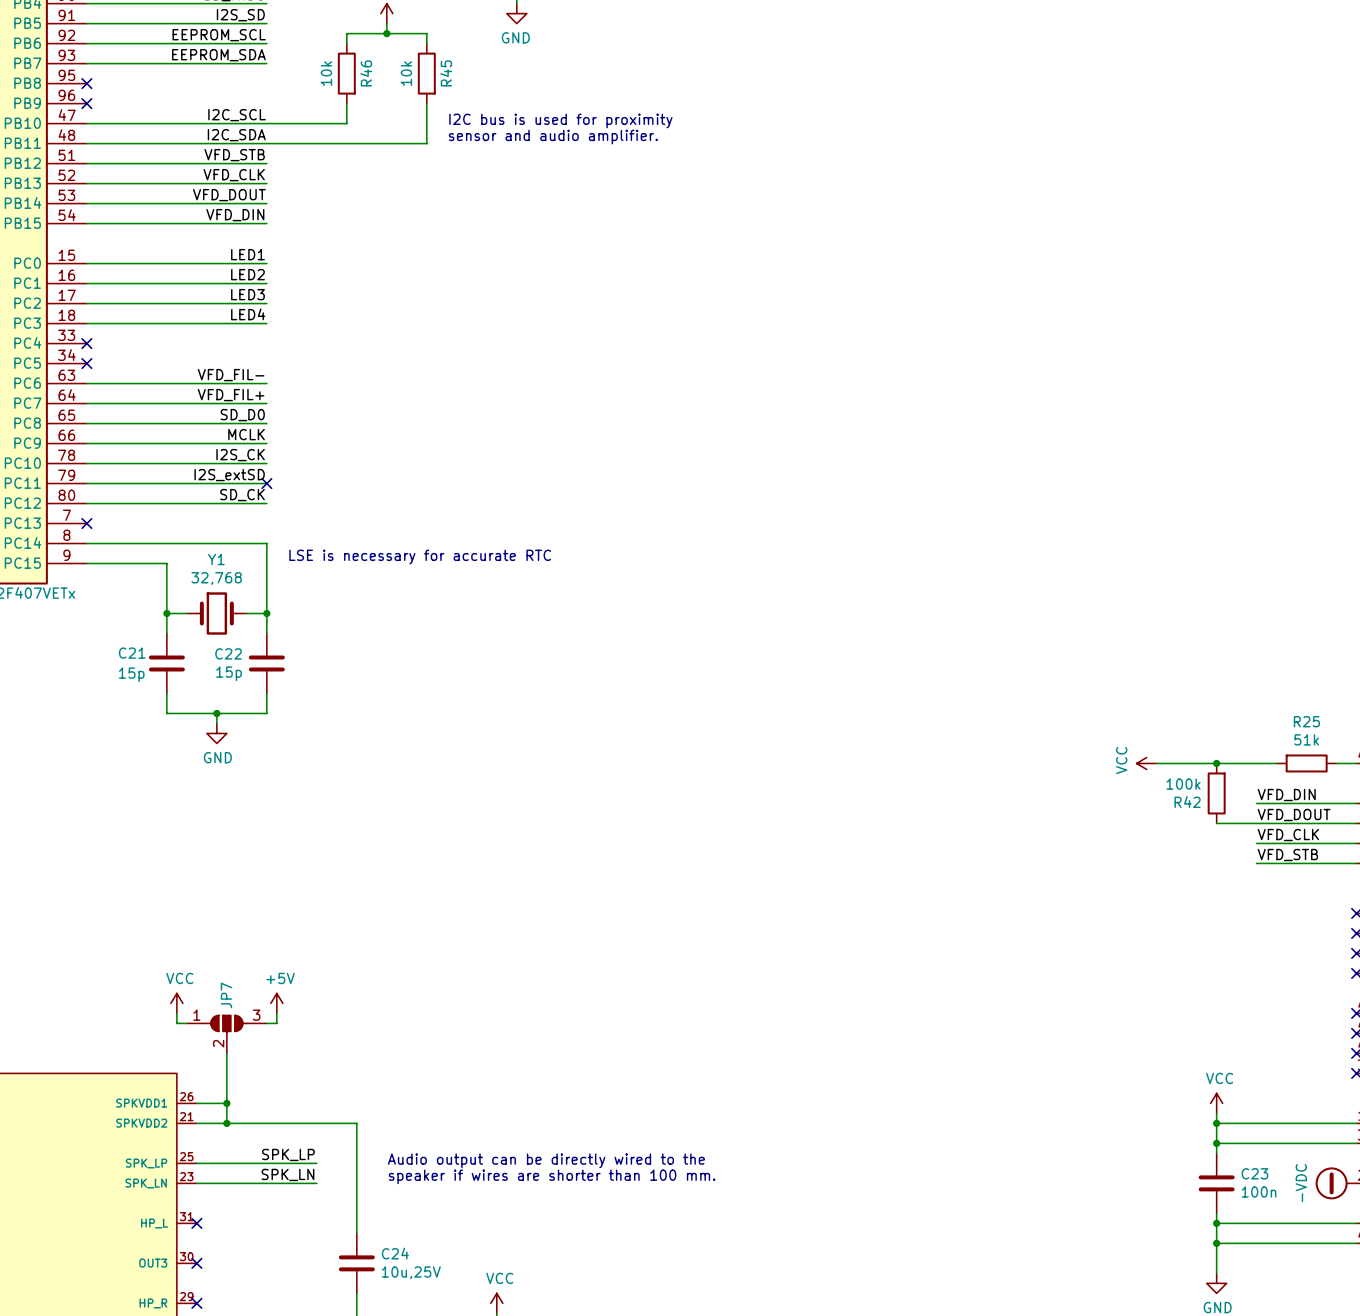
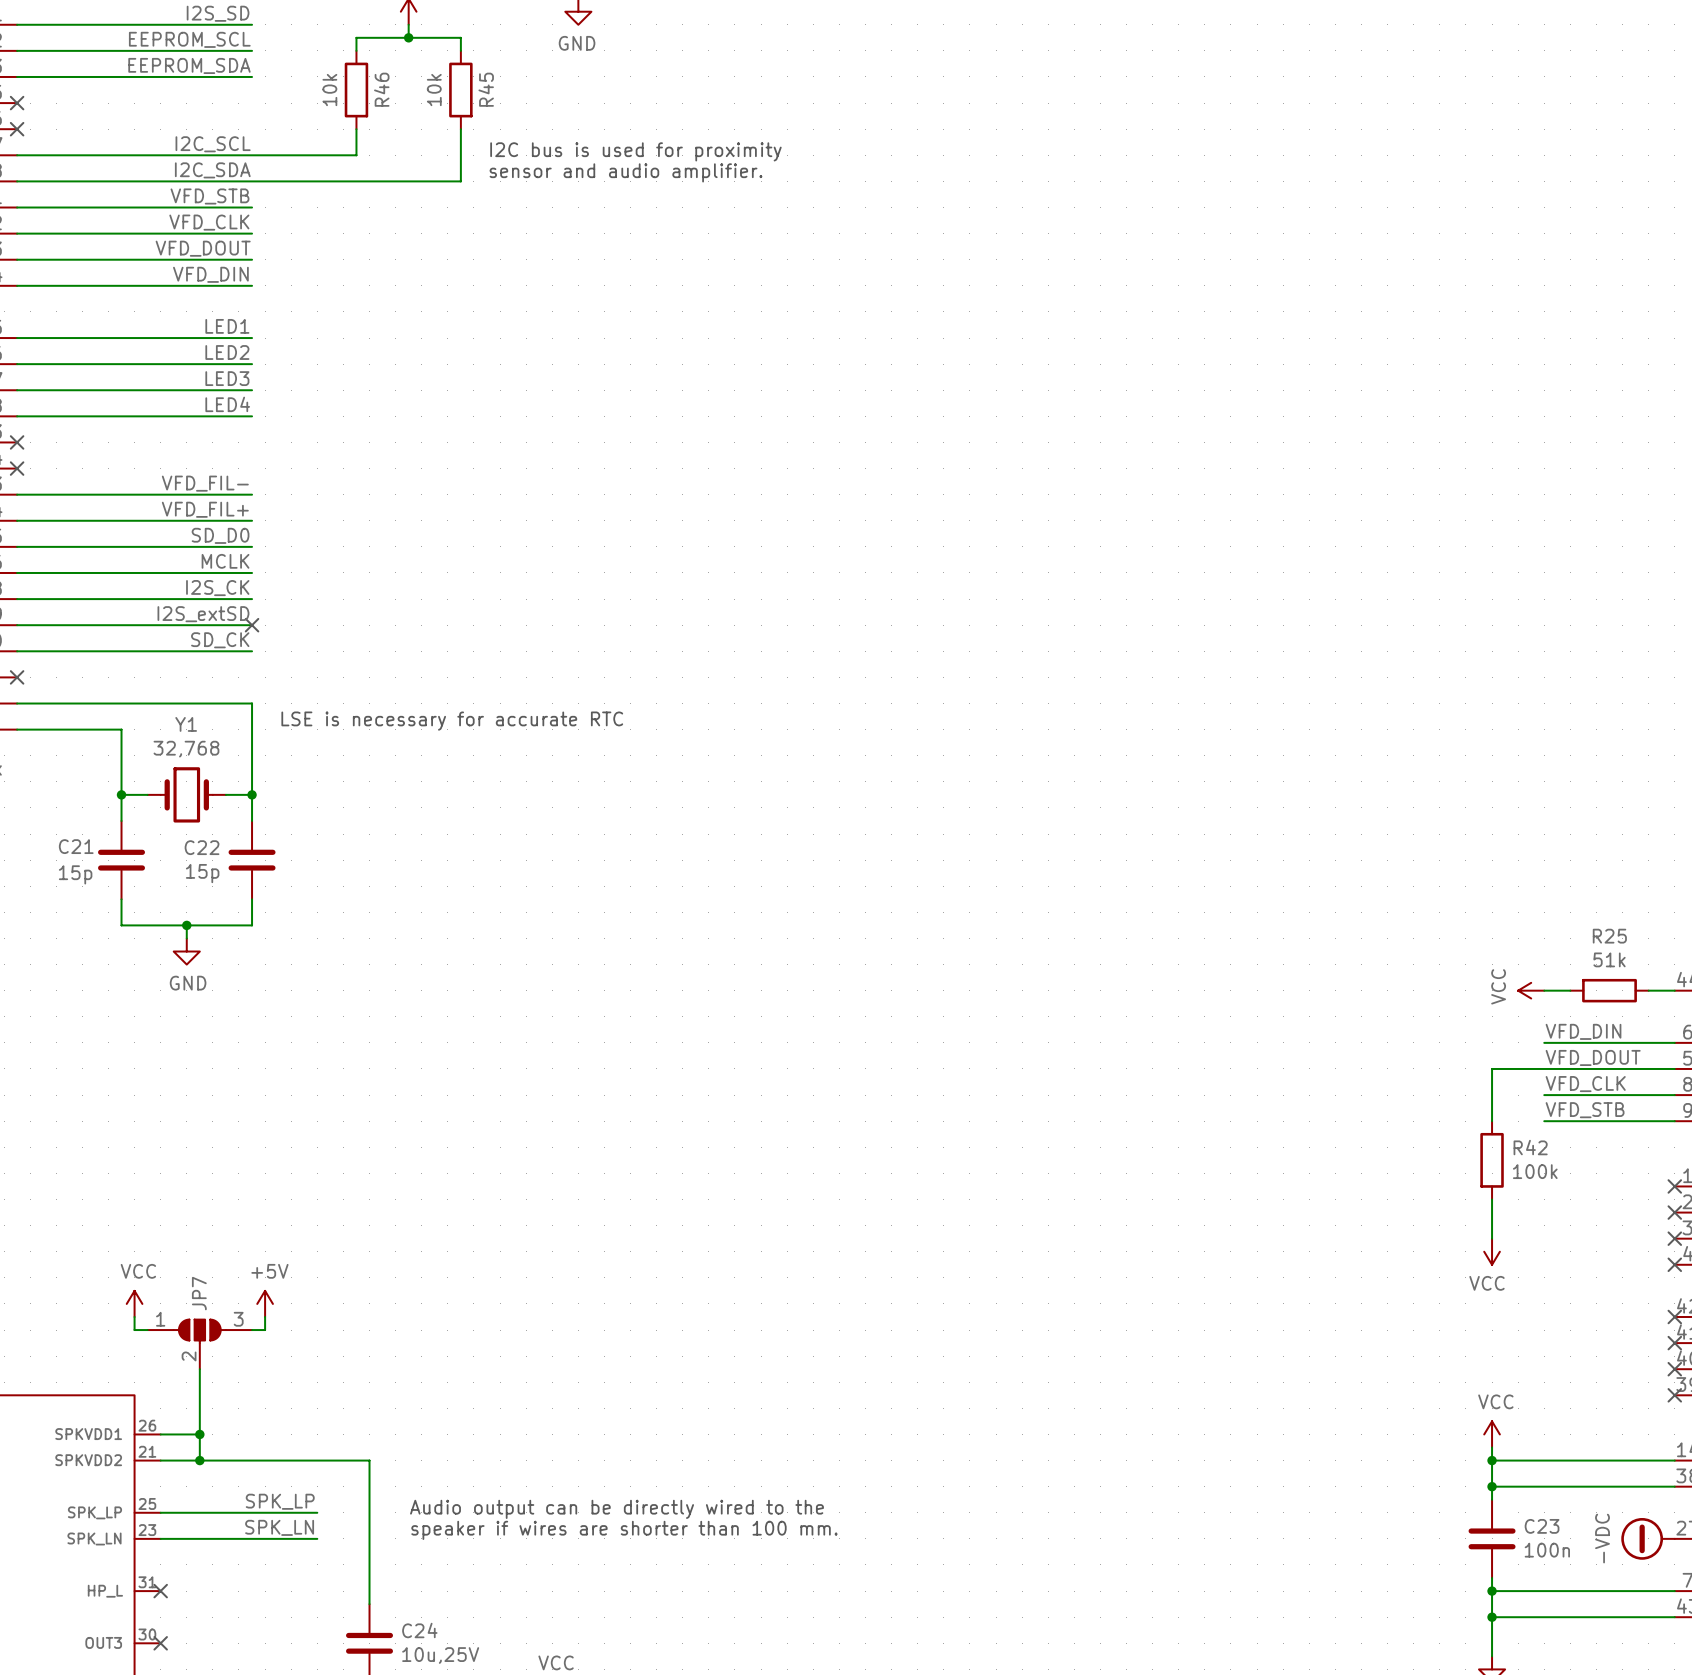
power symbol position: VCC (1146, 763) -> VCC (1531, 990)
wire: (1156, 763) (1256, 763) -> none
junction: (1216, 763) -> none
R42 value position: 100k (1183, 784) -> 100k (1535, 1171)
R42 position: (1216, 793) -> (1492, 1160)
R42 name position: R42 (1187, 802) -> R42 (1530, 1147)
wire: none -> (1492, 1068) (1492, 1121)
wire: none -> (1492, 1199) (1492, 1238)
power symbol: none -> VCC (1492, 1251)

